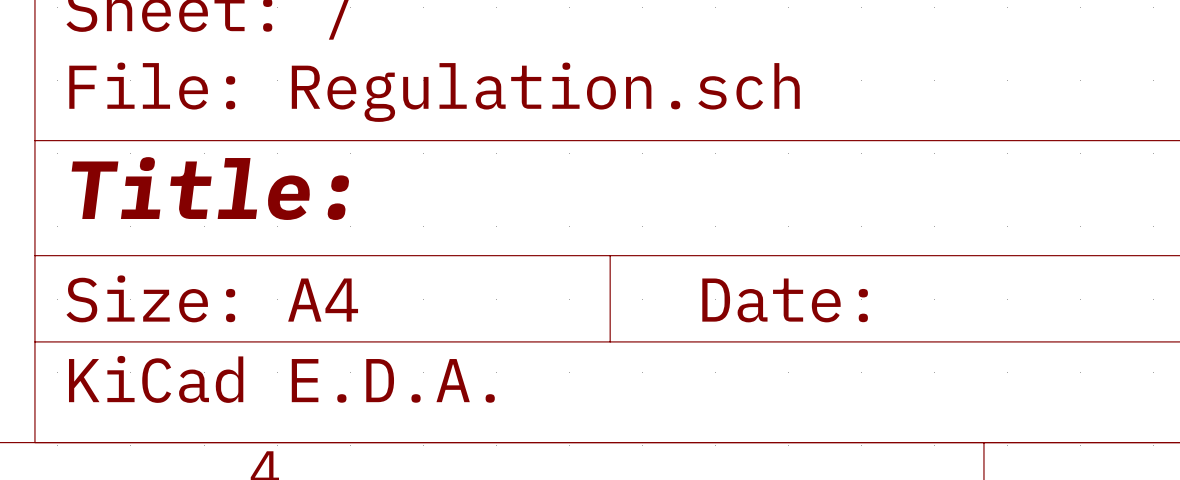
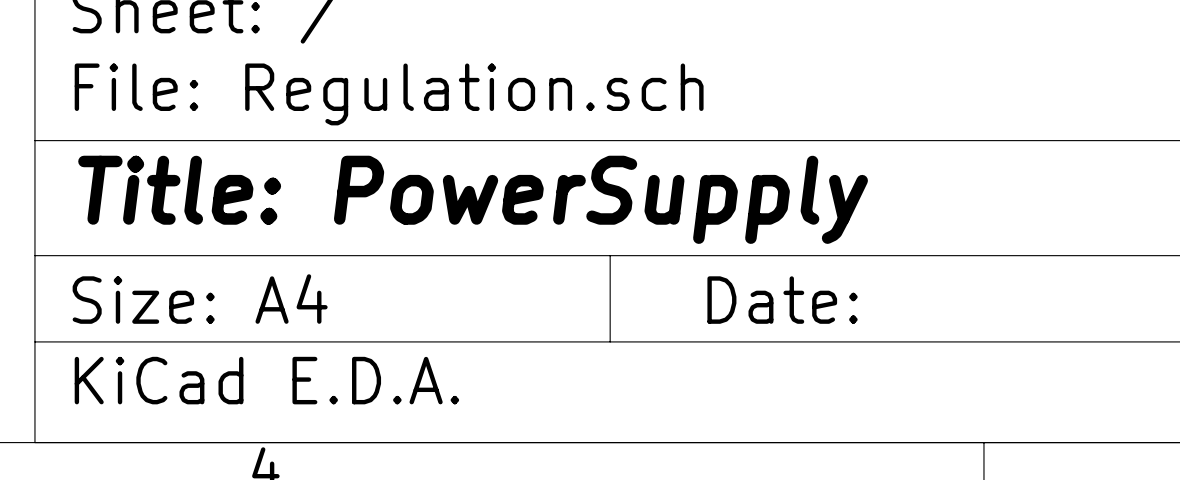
title block: Title: (210, 188) -> Title: PowerSupply (473, 199)

